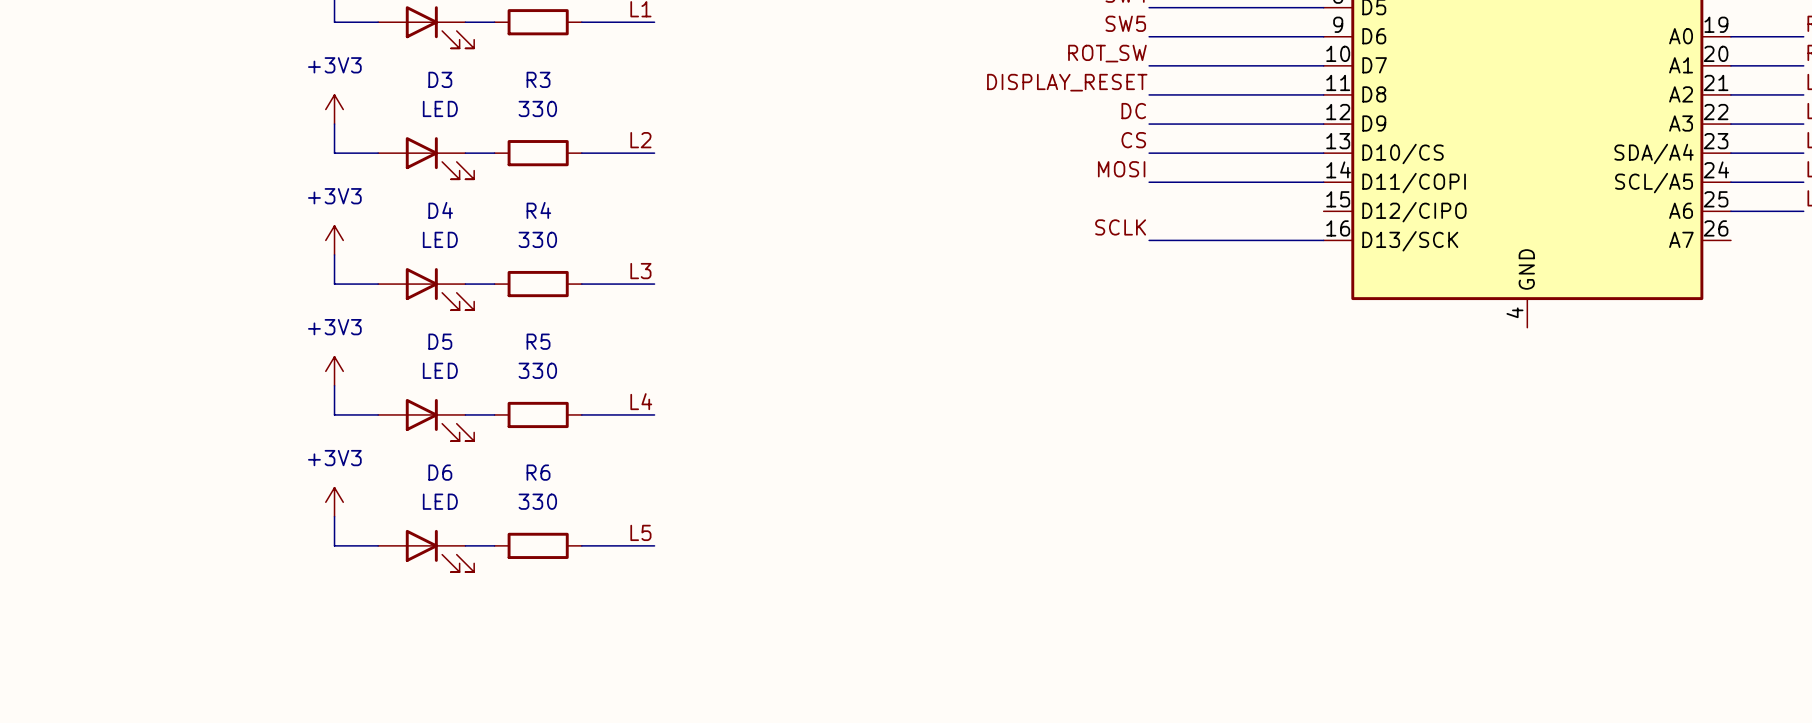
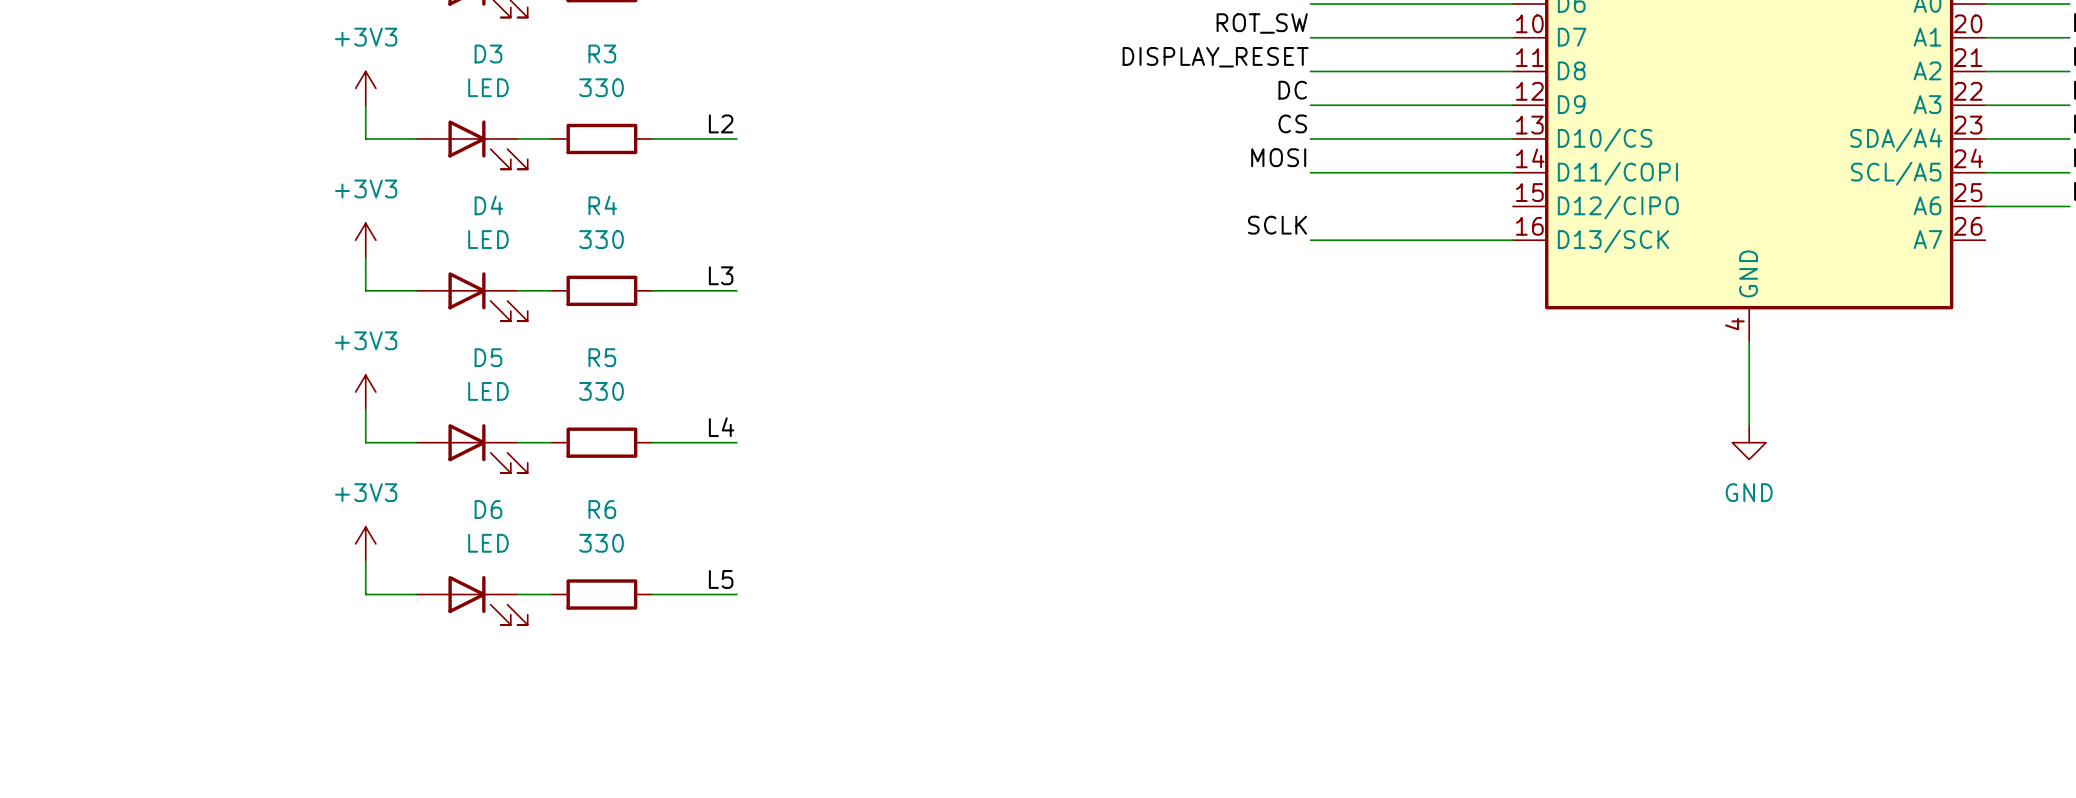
wire: none -> (1749, 341) (1749, 425)
power symbol: none -> GND (1749, 442)

